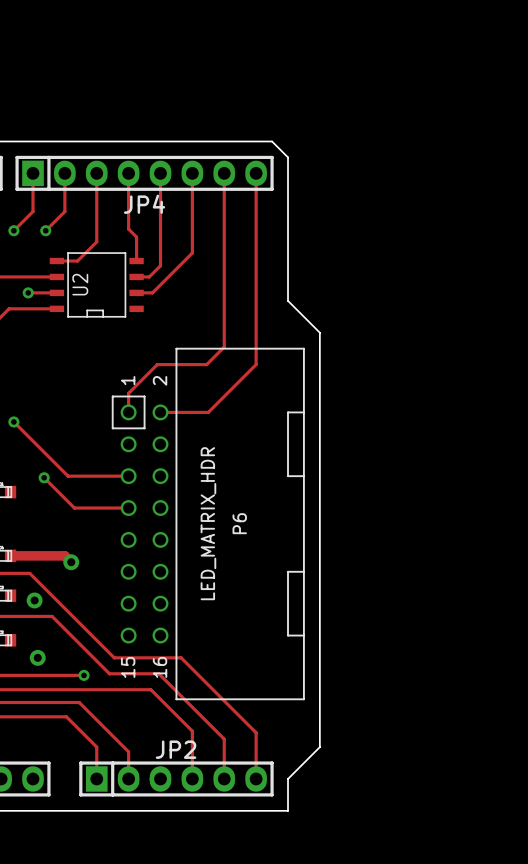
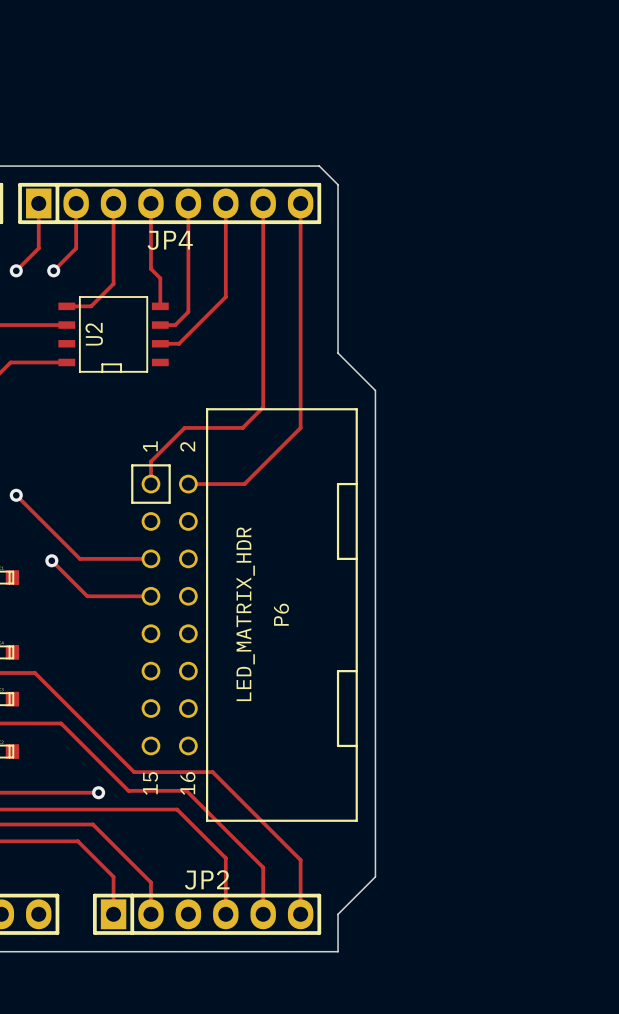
track: (28, 292) (56, 292) -> none
via: (28, 292) -> none
track: (10, 555) (64, 555) (71, 562) -> none
via: (71, 562) -> none
via: (34, 600) -> none
via: (37, 657) -> none

